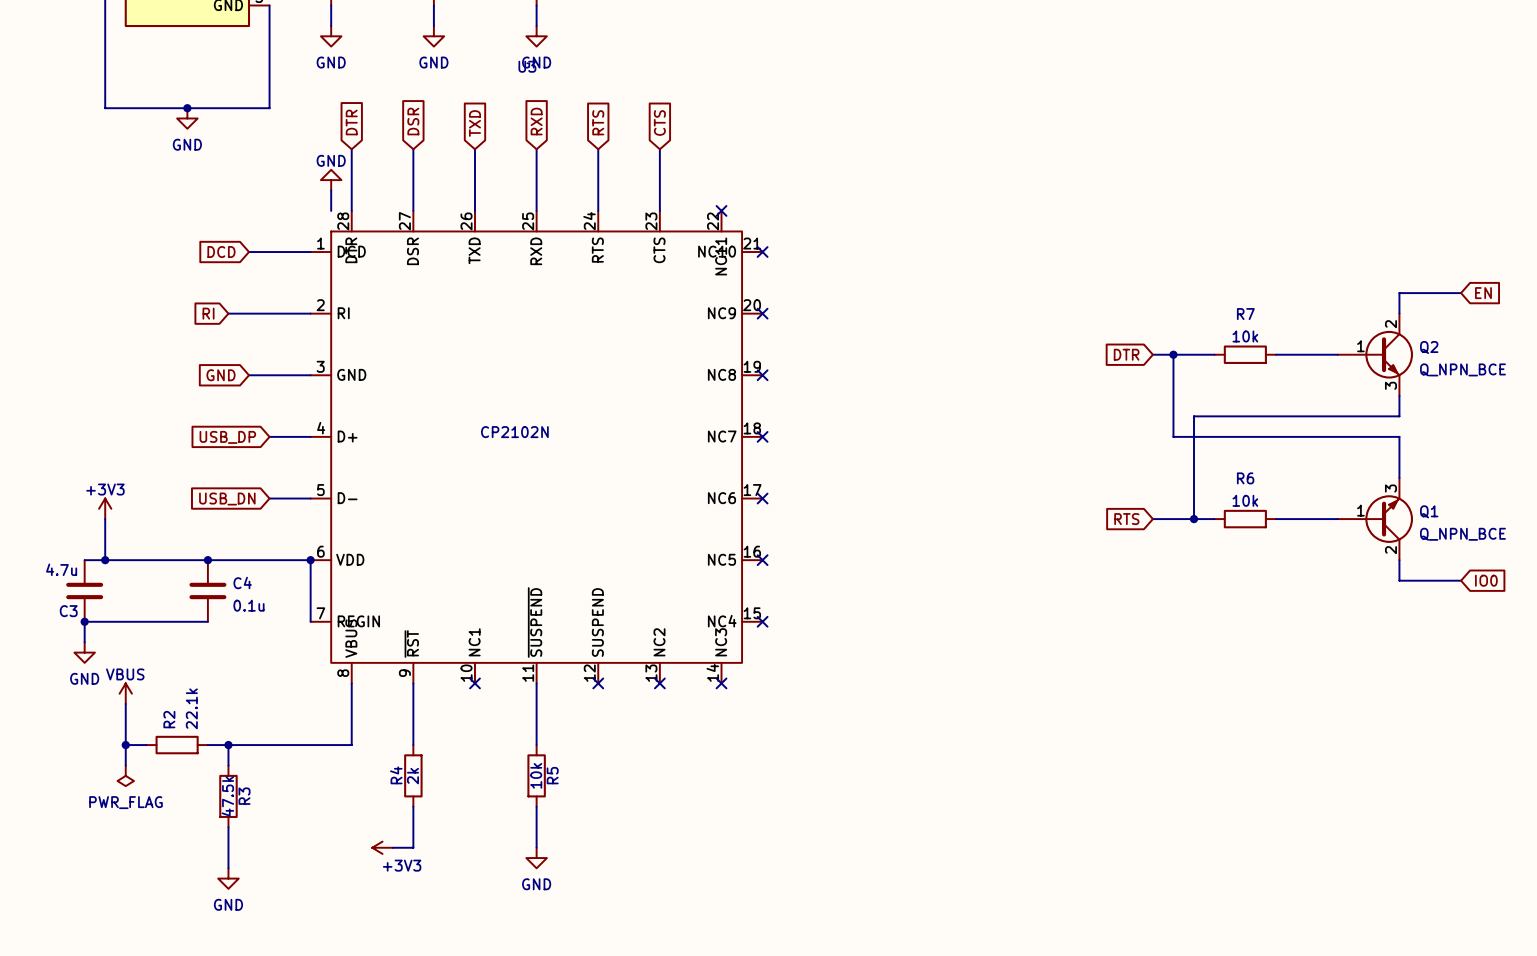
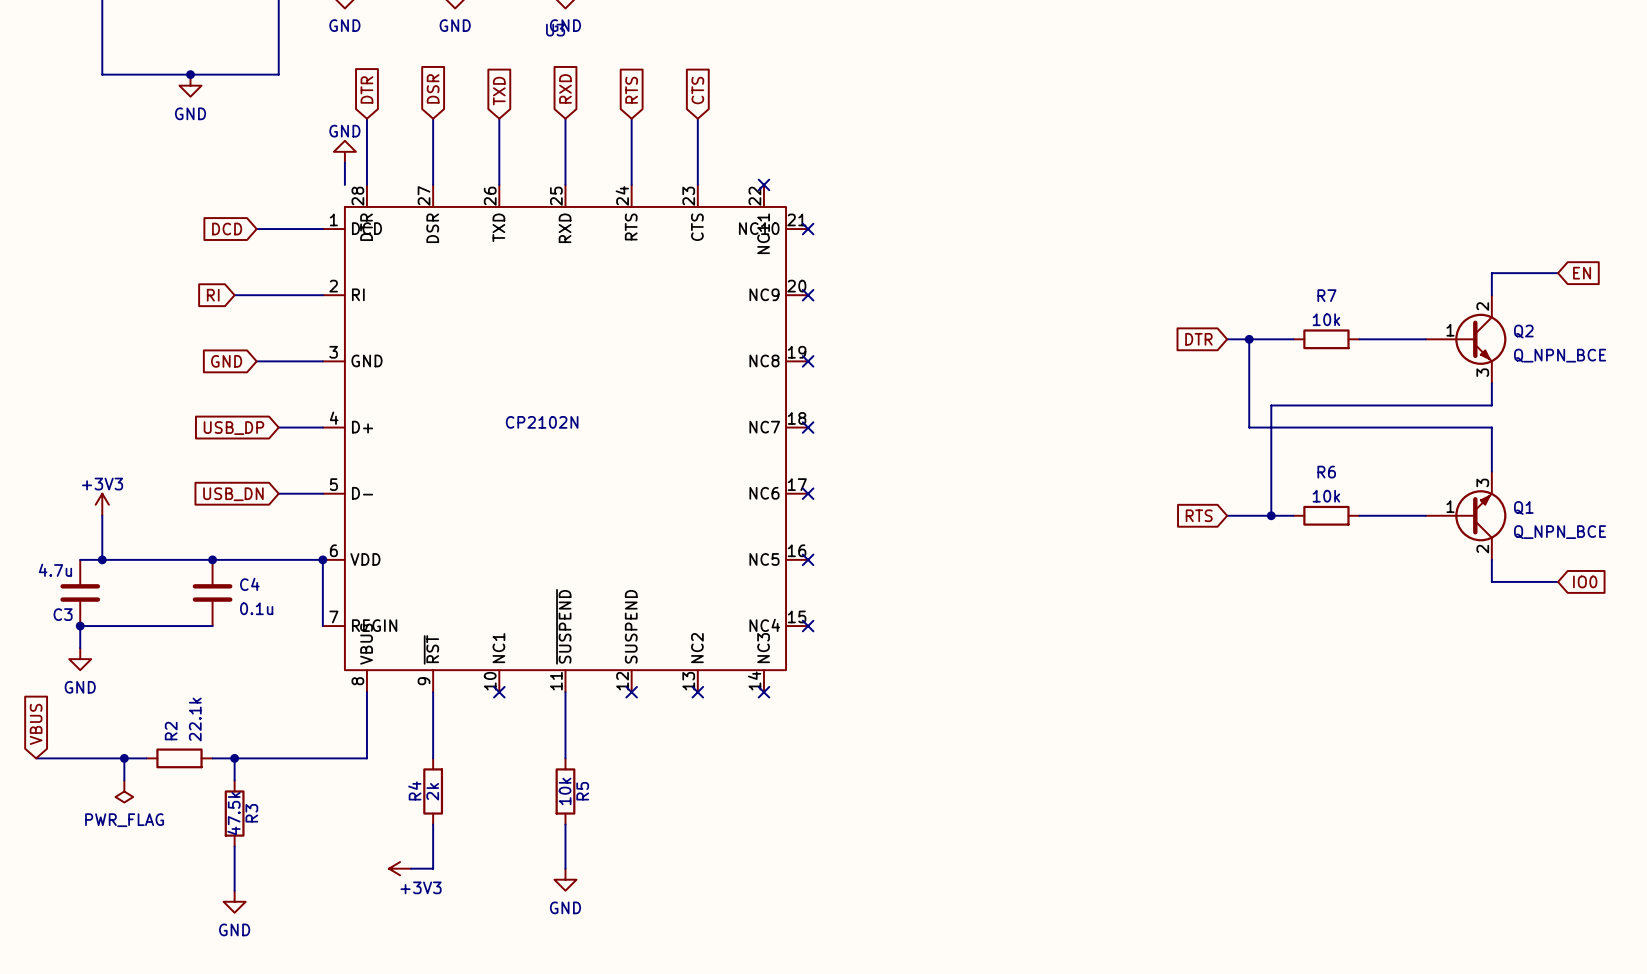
power symbol: VBUS (125, 693) -> none
wire: (125, 703) (125, 745) -> (36, 758) (124, 758)
global label: none -> VBUS (36, 724)

